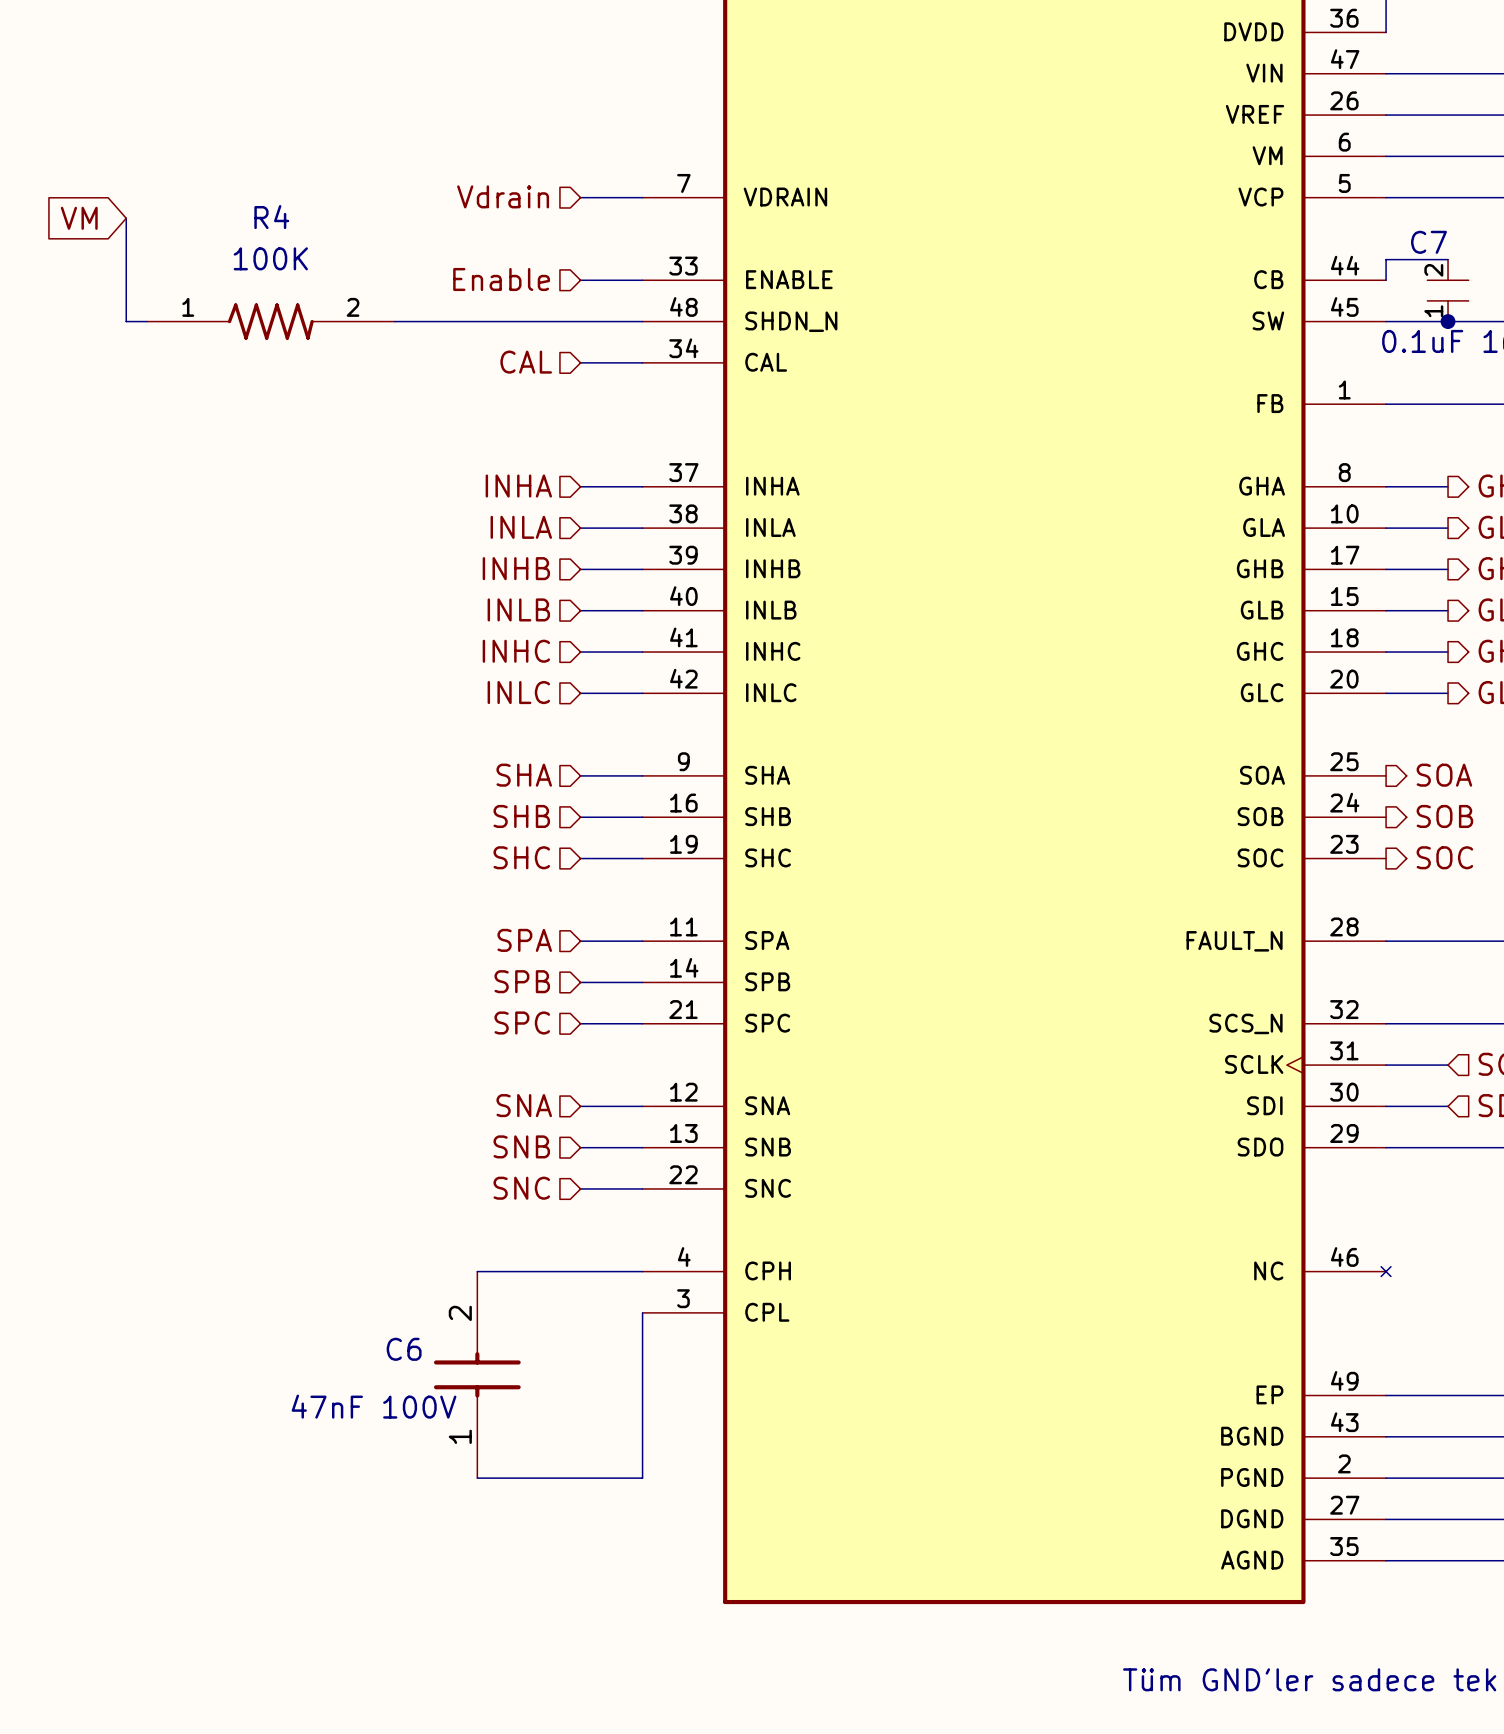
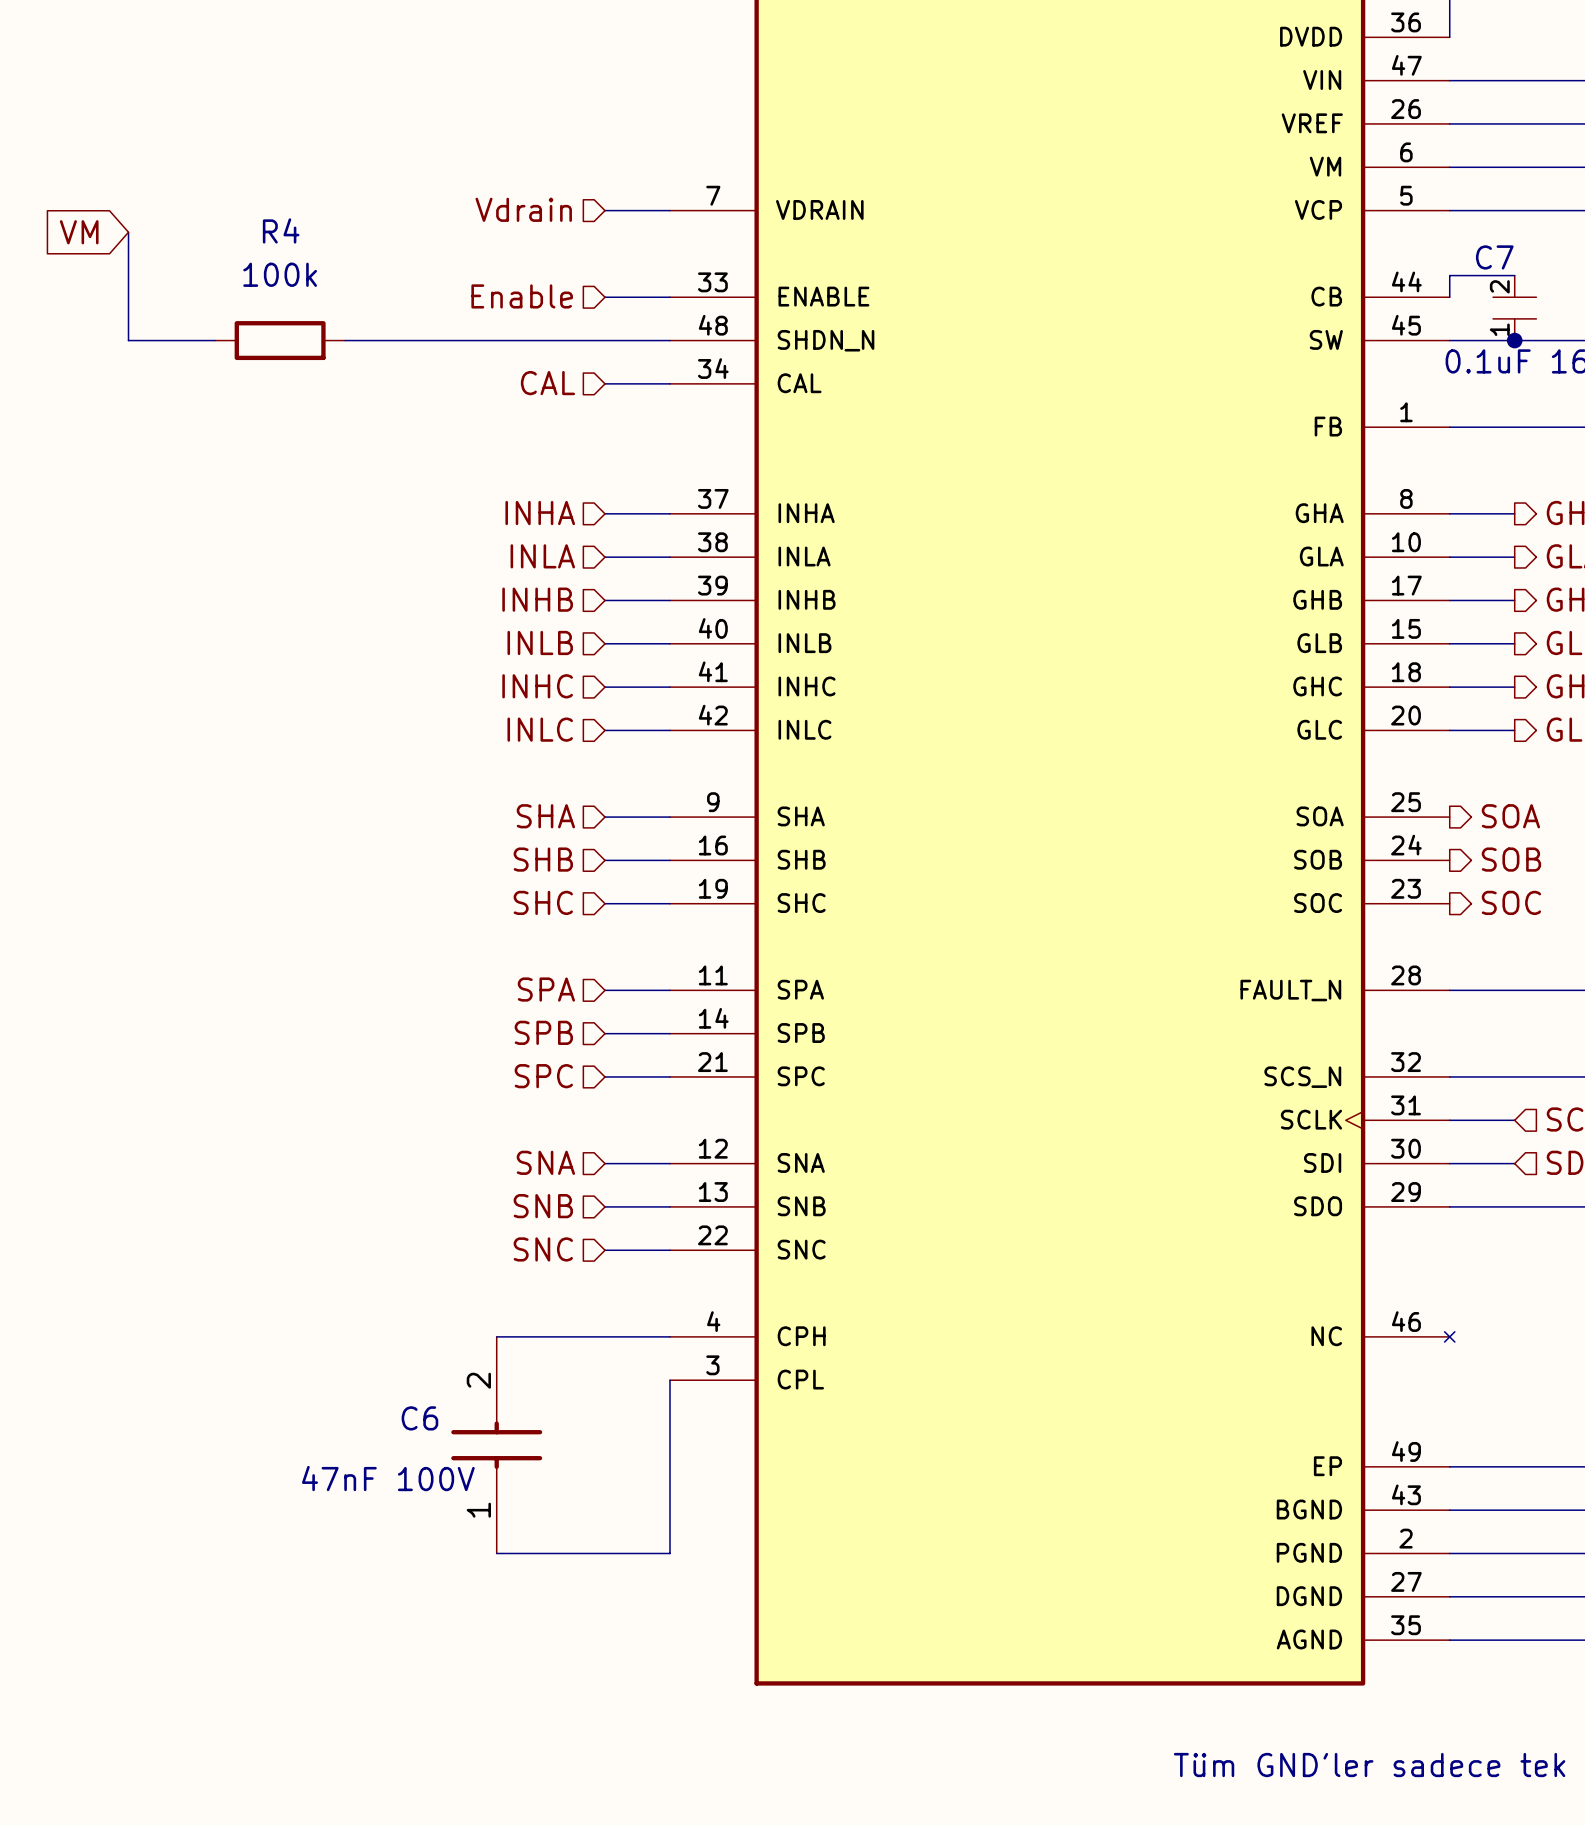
R4 value: 100K (270, 258) -> 100k (280, 274)
R4 symbol: [146, 303, 395, 340] -> [215, 321, 346, 361]

